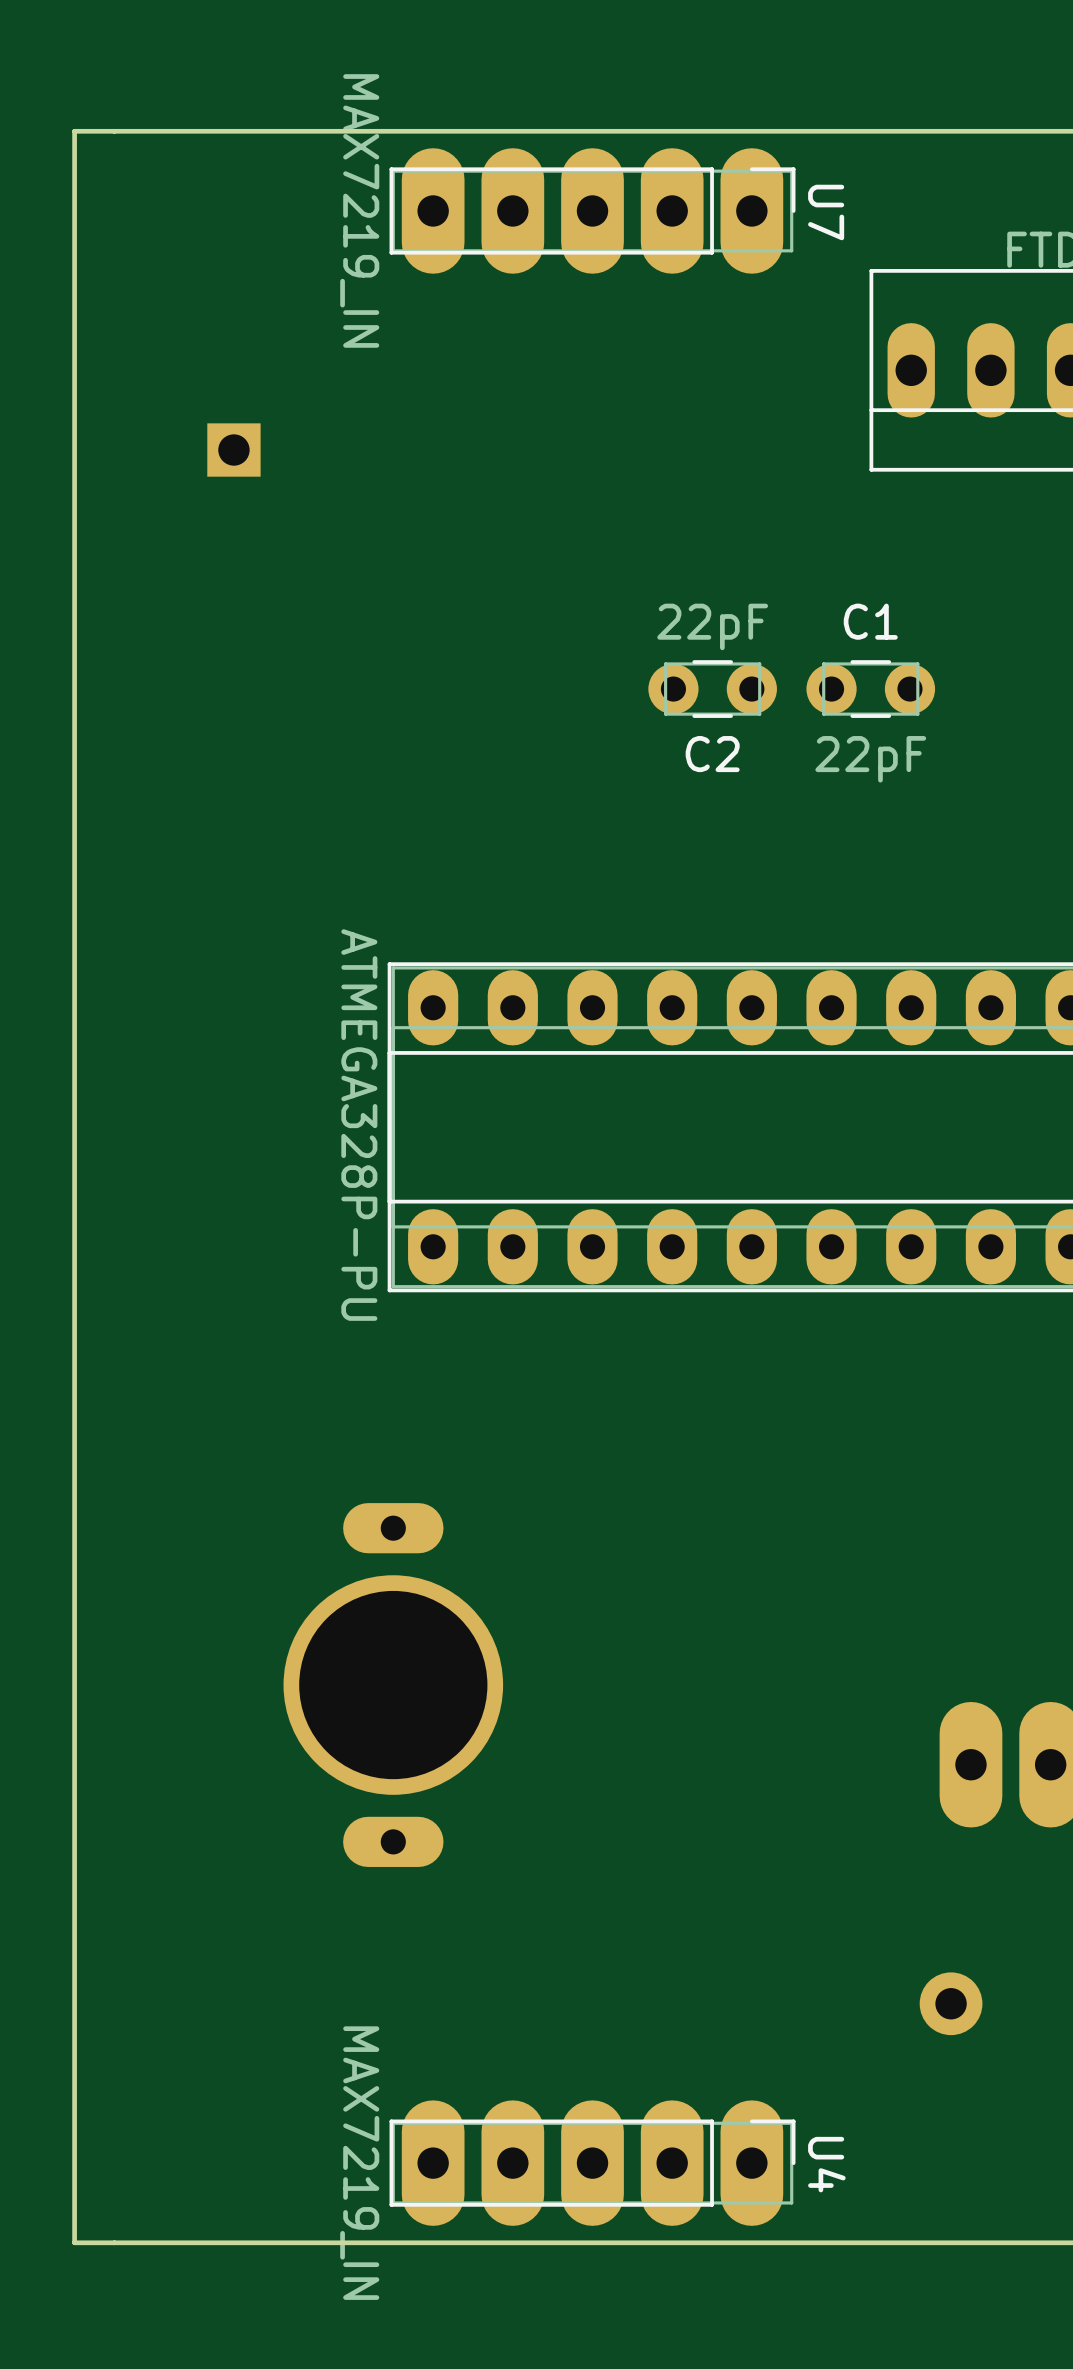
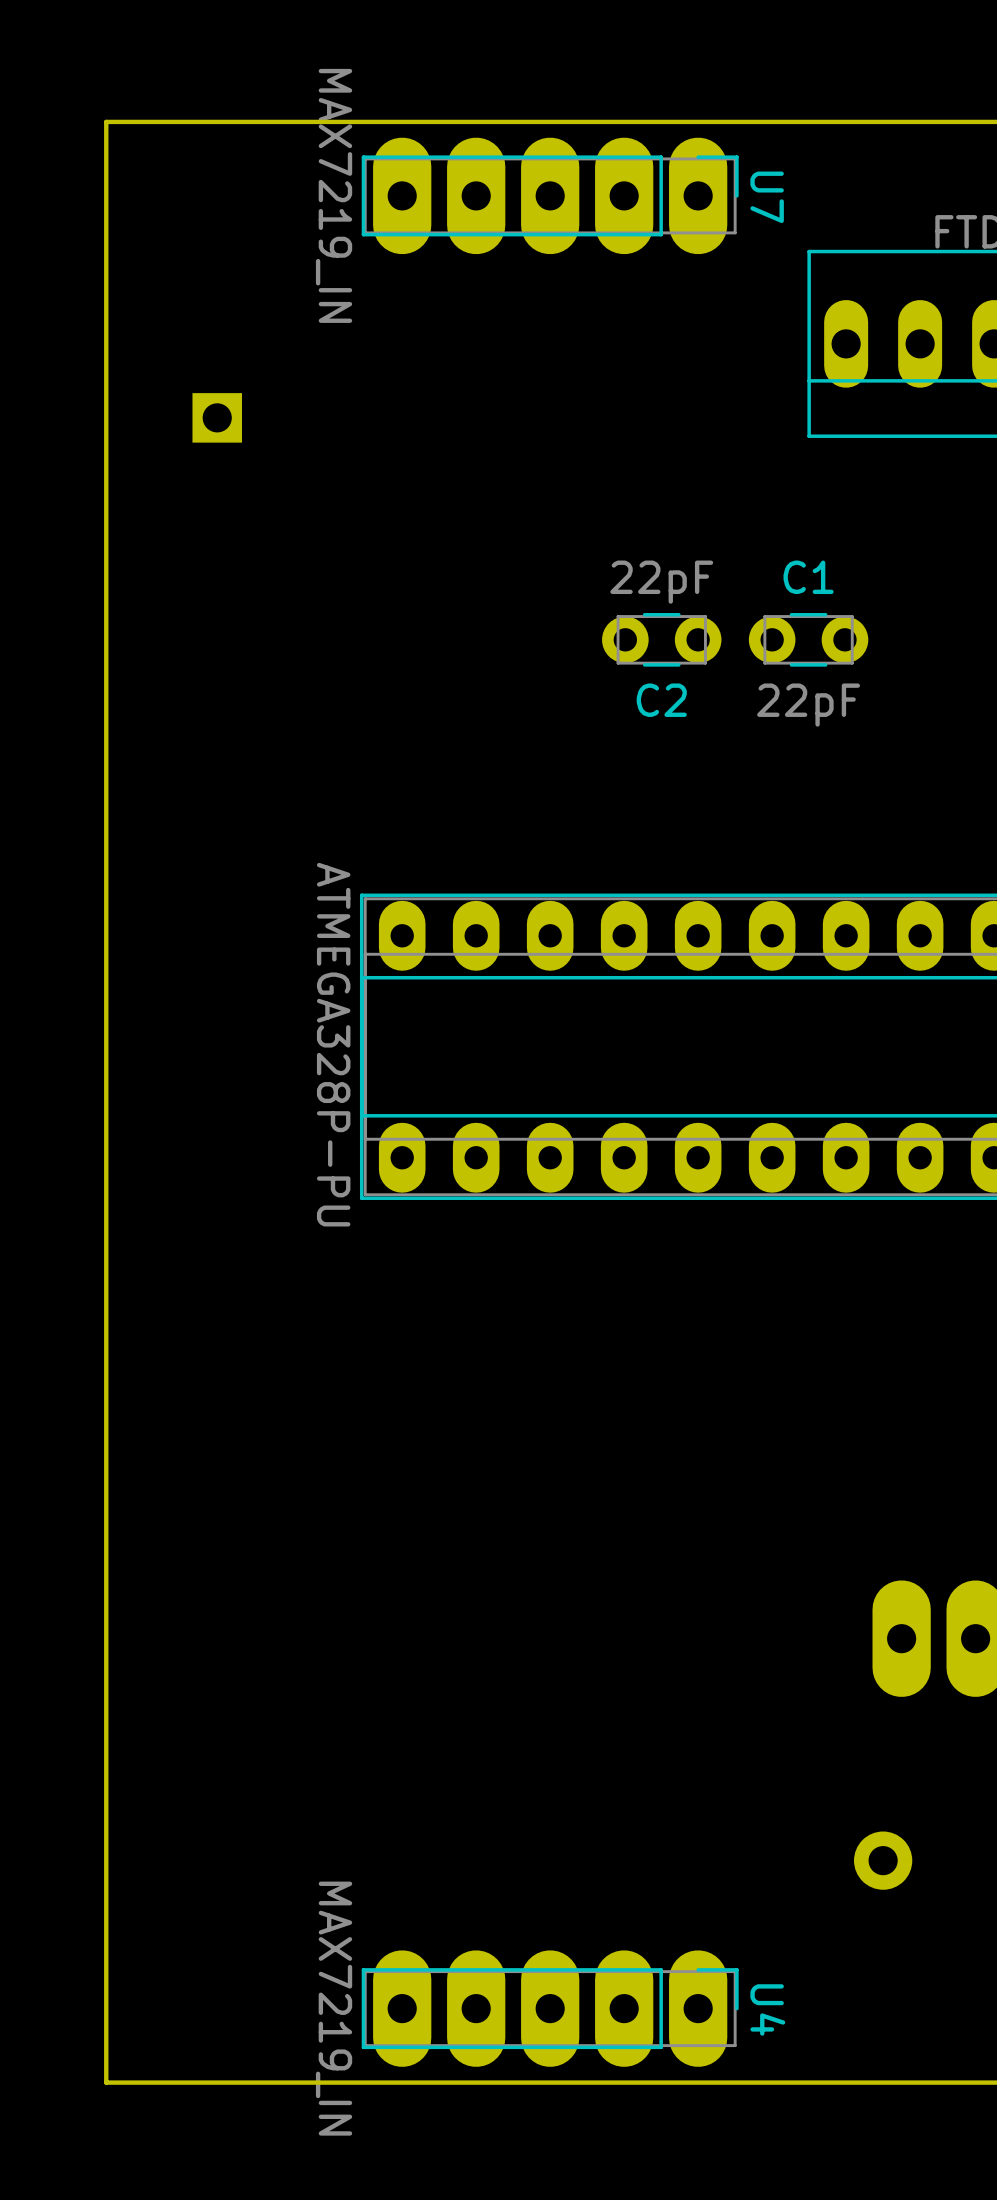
board edge: (114, 131) (74, 131) (74, 2242) (114, 2242) -> (106, 121) (106, 2082)
part: (393, 1685) -> none

